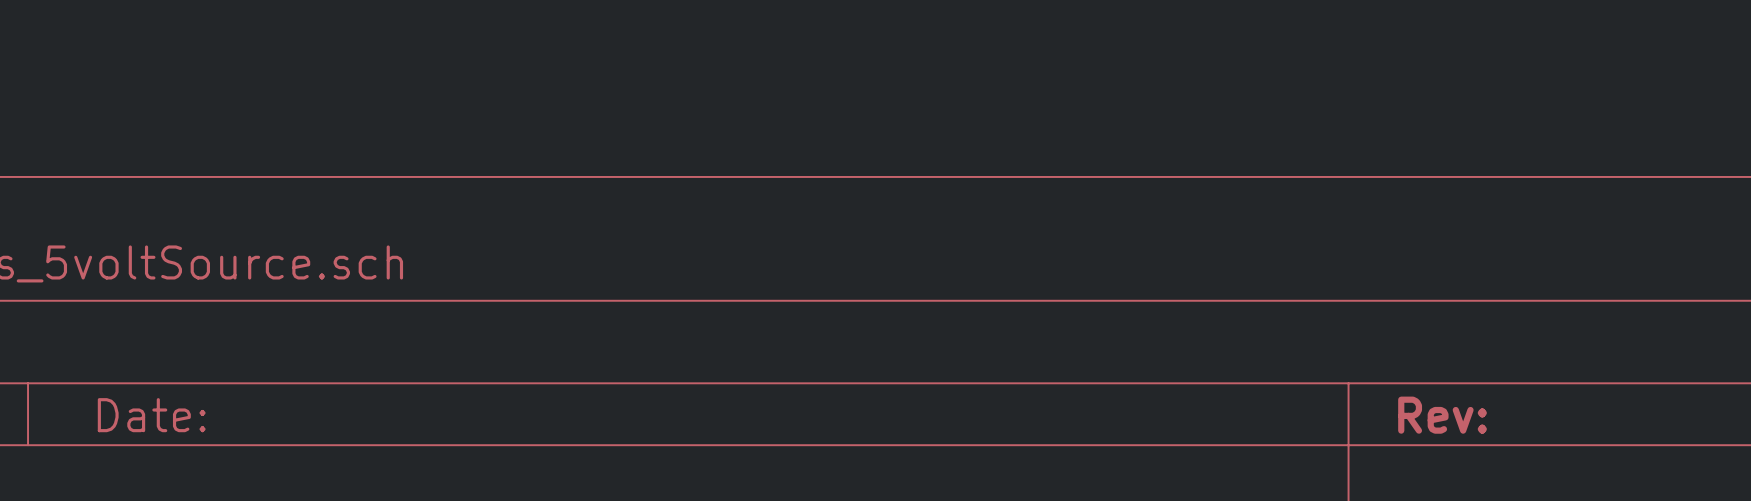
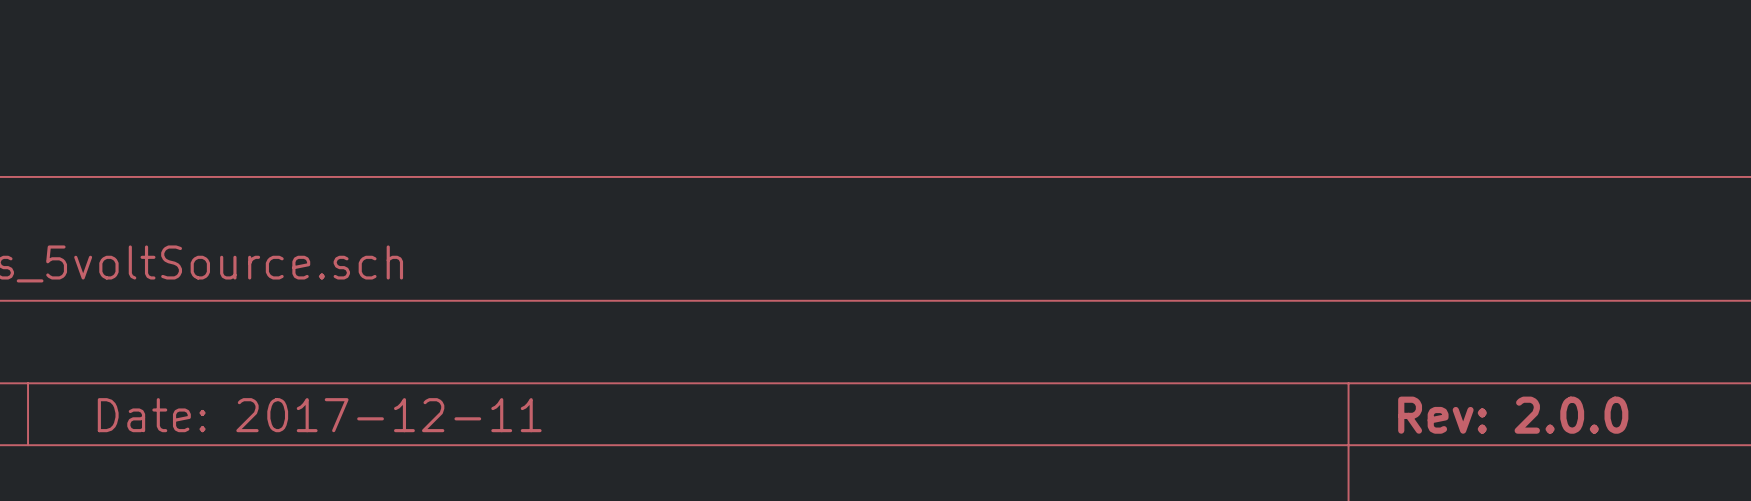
title block: Date: (151, 415) -> Date: 2017-12-11 (319, 415)
title block: Rev: (1442, 415) -> Rev: 2.0.0 (1513, 415)

